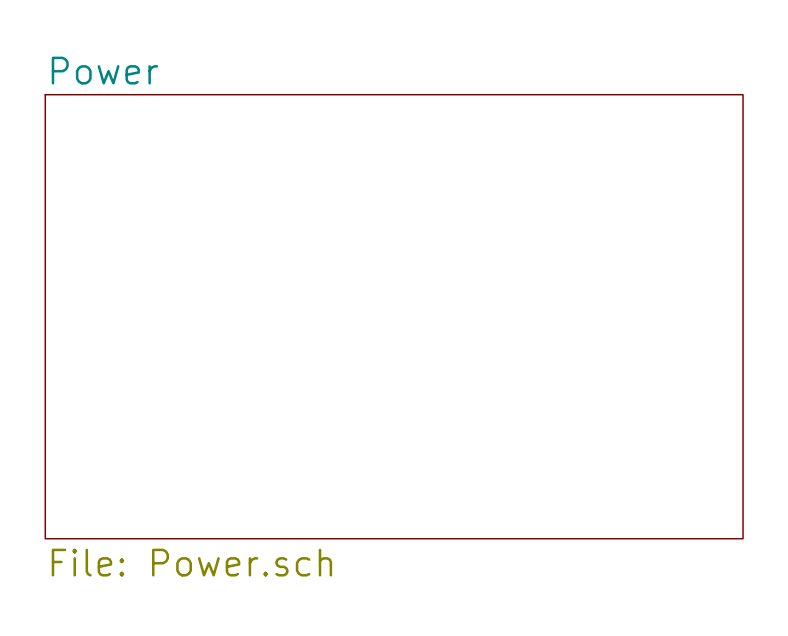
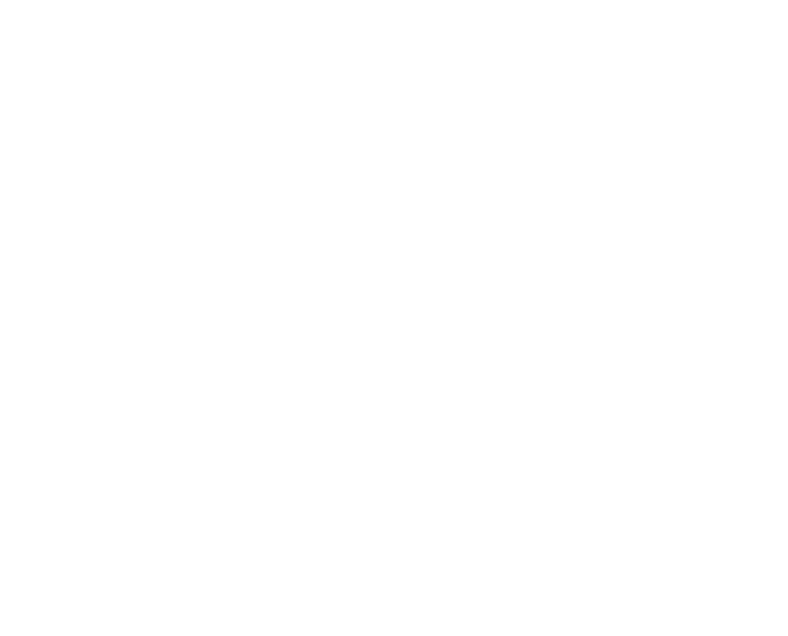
sheet Power: File: Power.sch (394, 316) -> none

